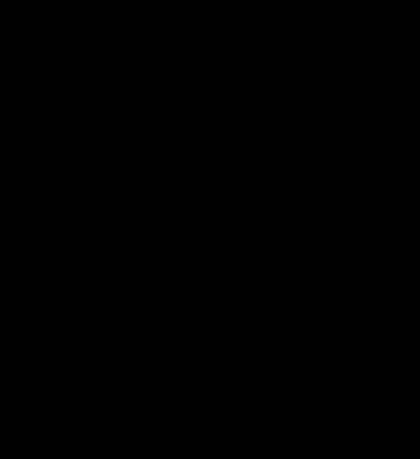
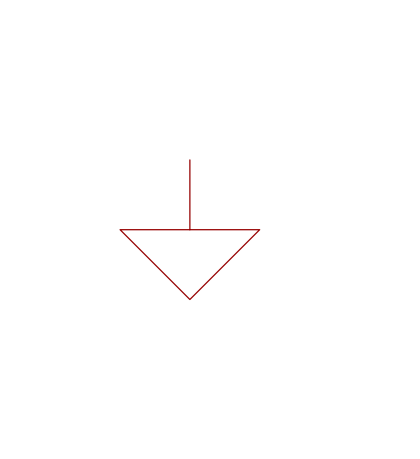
power symbol: none -> (189, 229)

